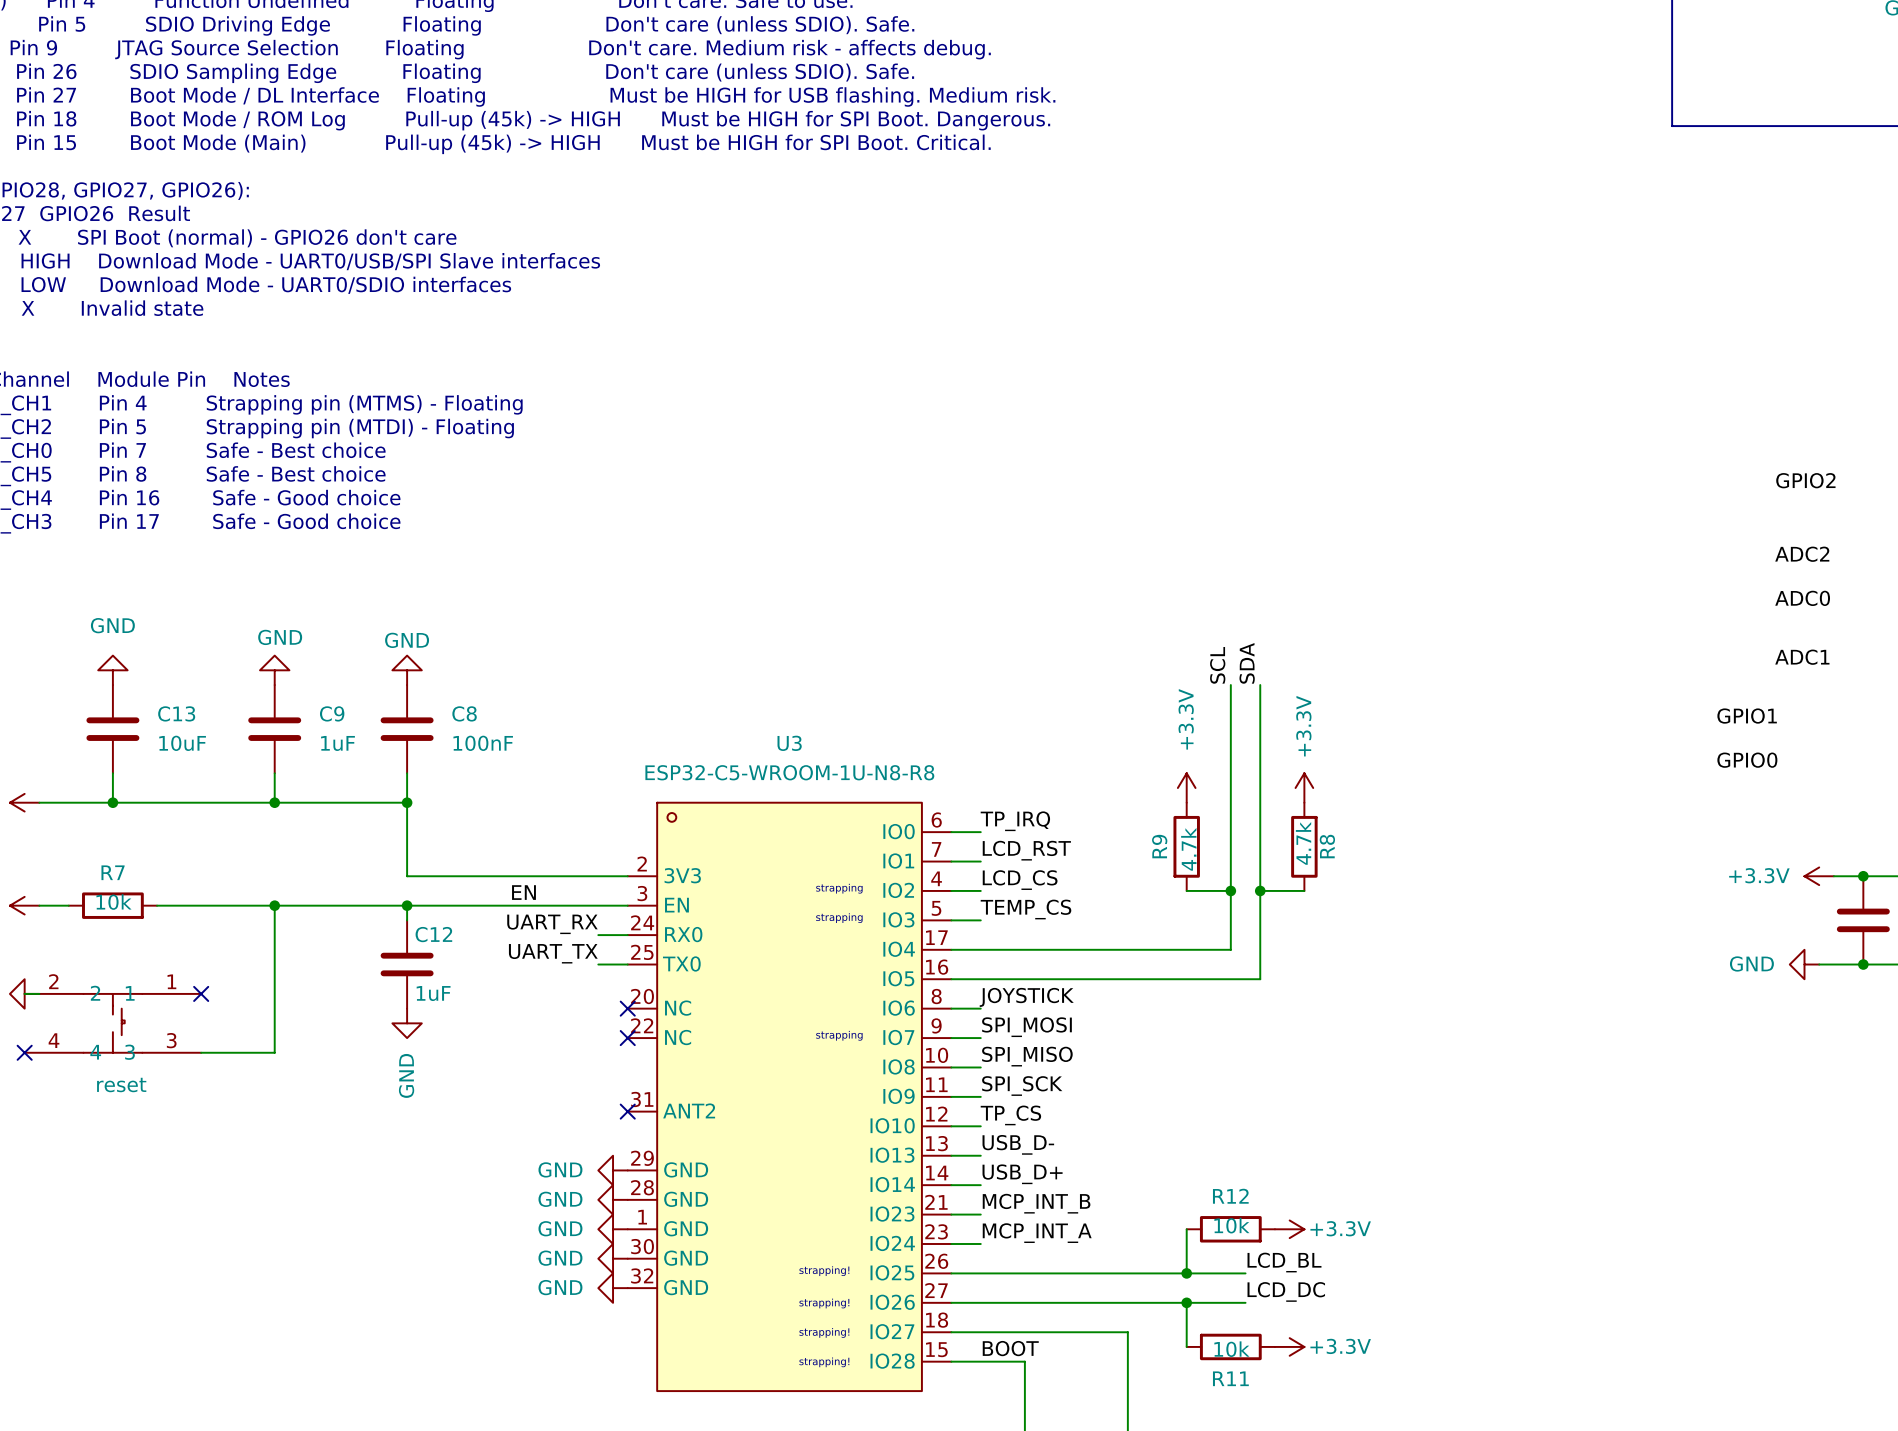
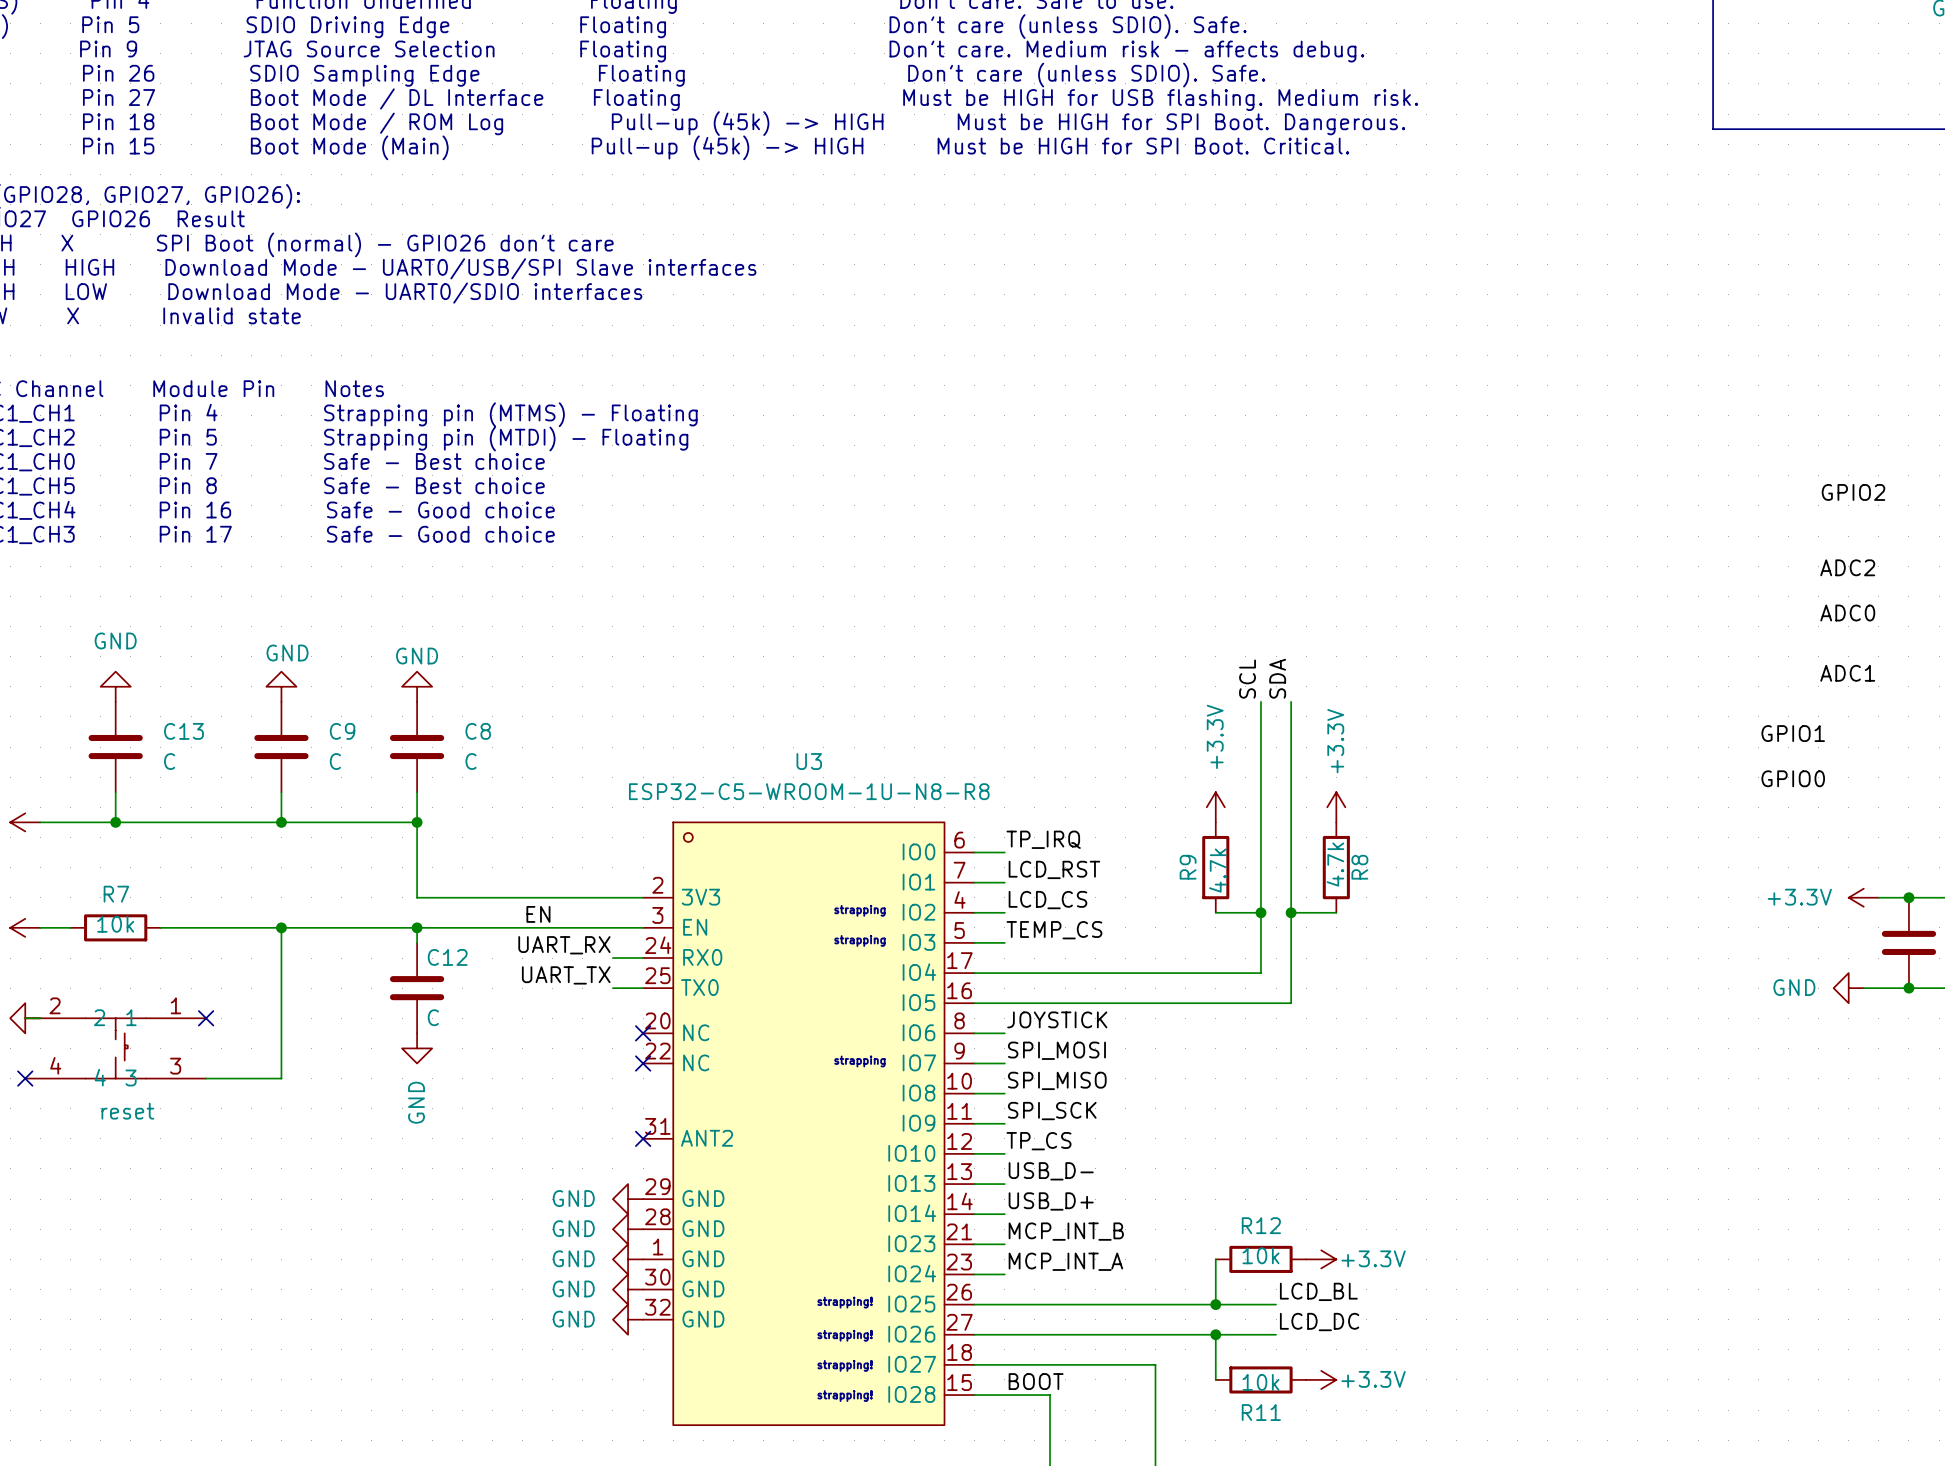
C13 value: 10uF (182, 743) -> C (169, 761)
C9 value: 1uF (337, 743) -> C (335, 761)
C8 value: 100nF (483, 743) -> C (471, 761)
C12 value: 1uF (433, 993) -> C (433, 1017)

